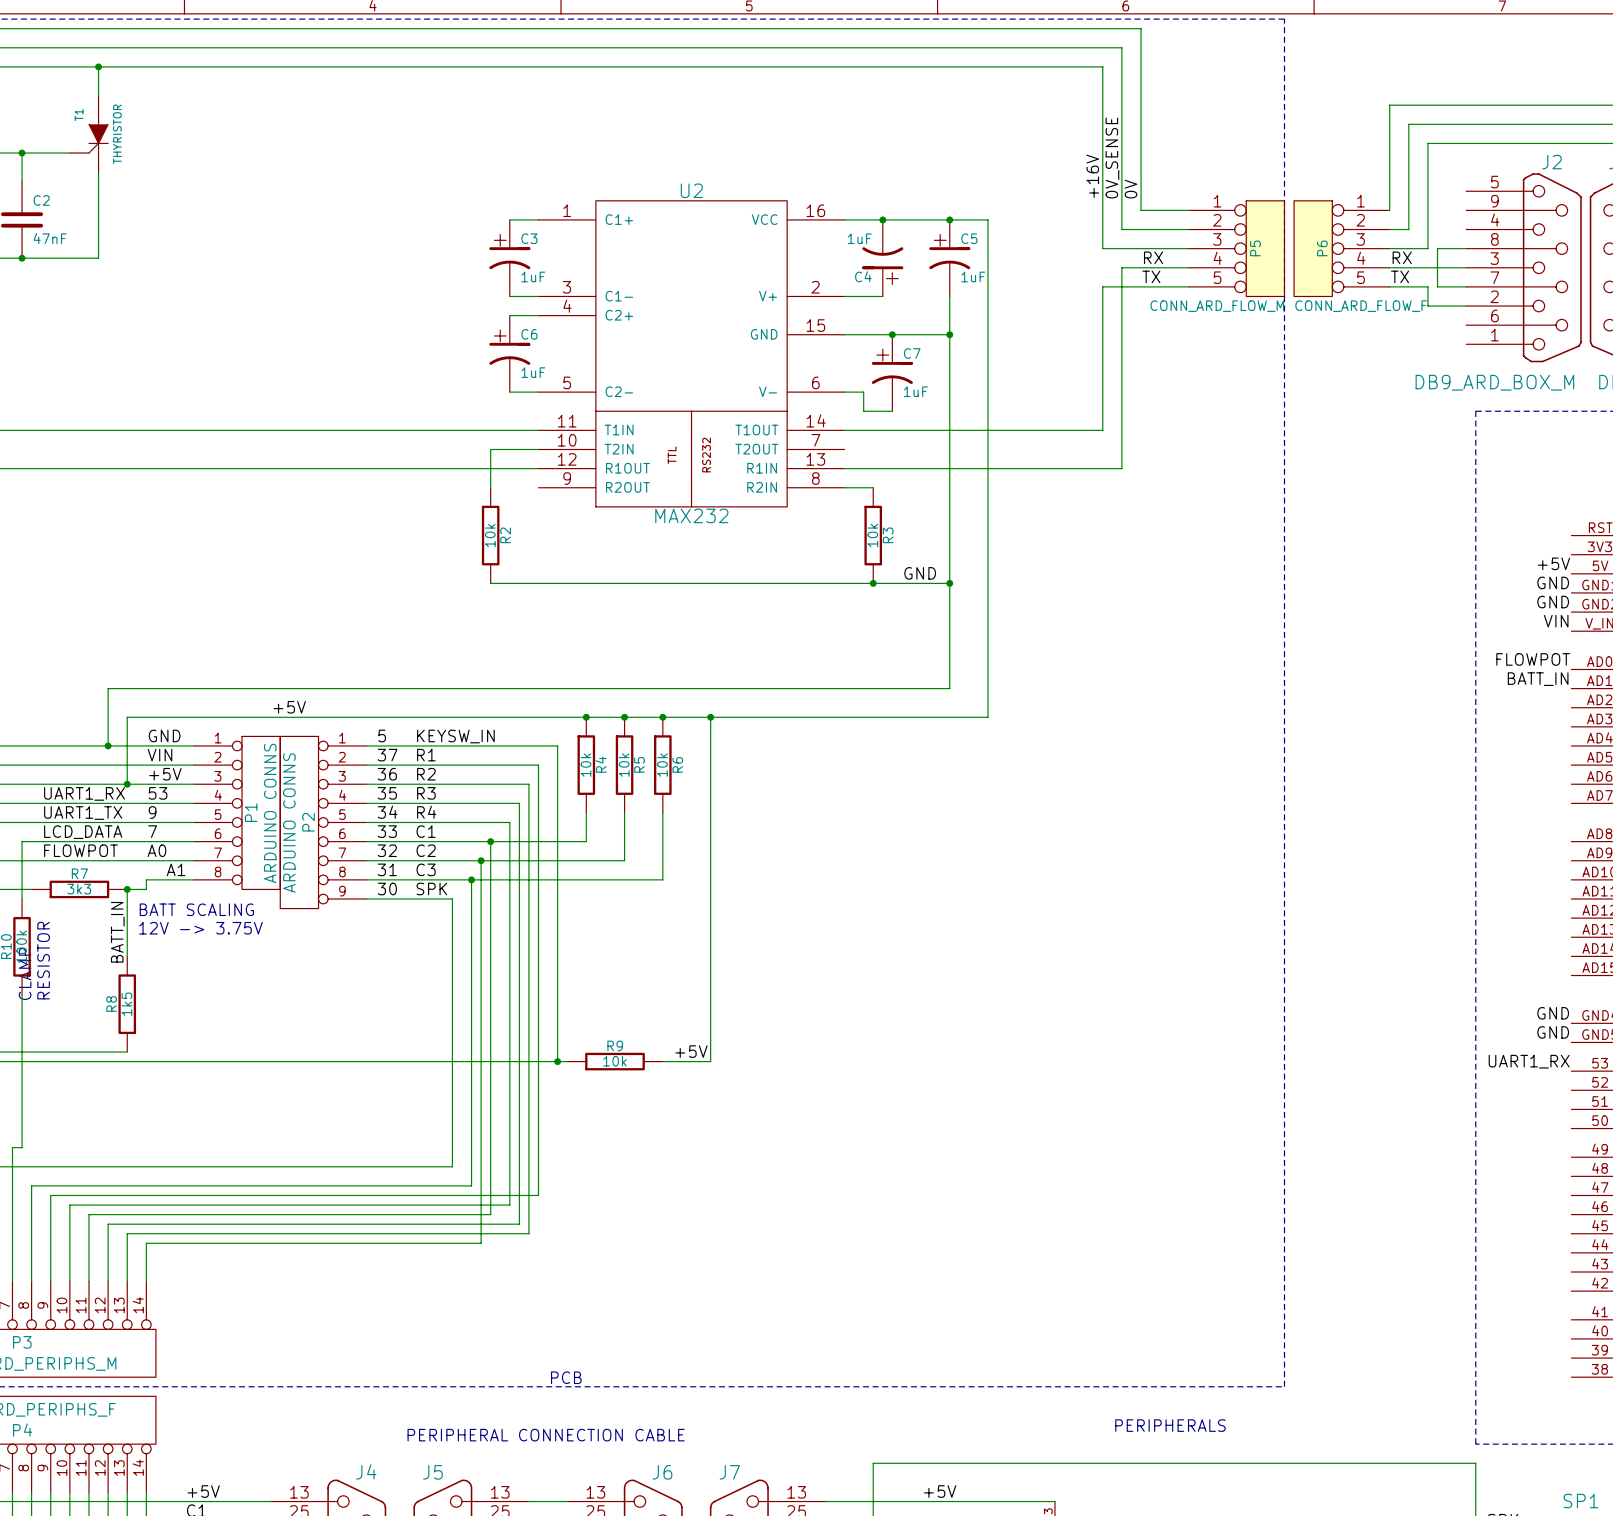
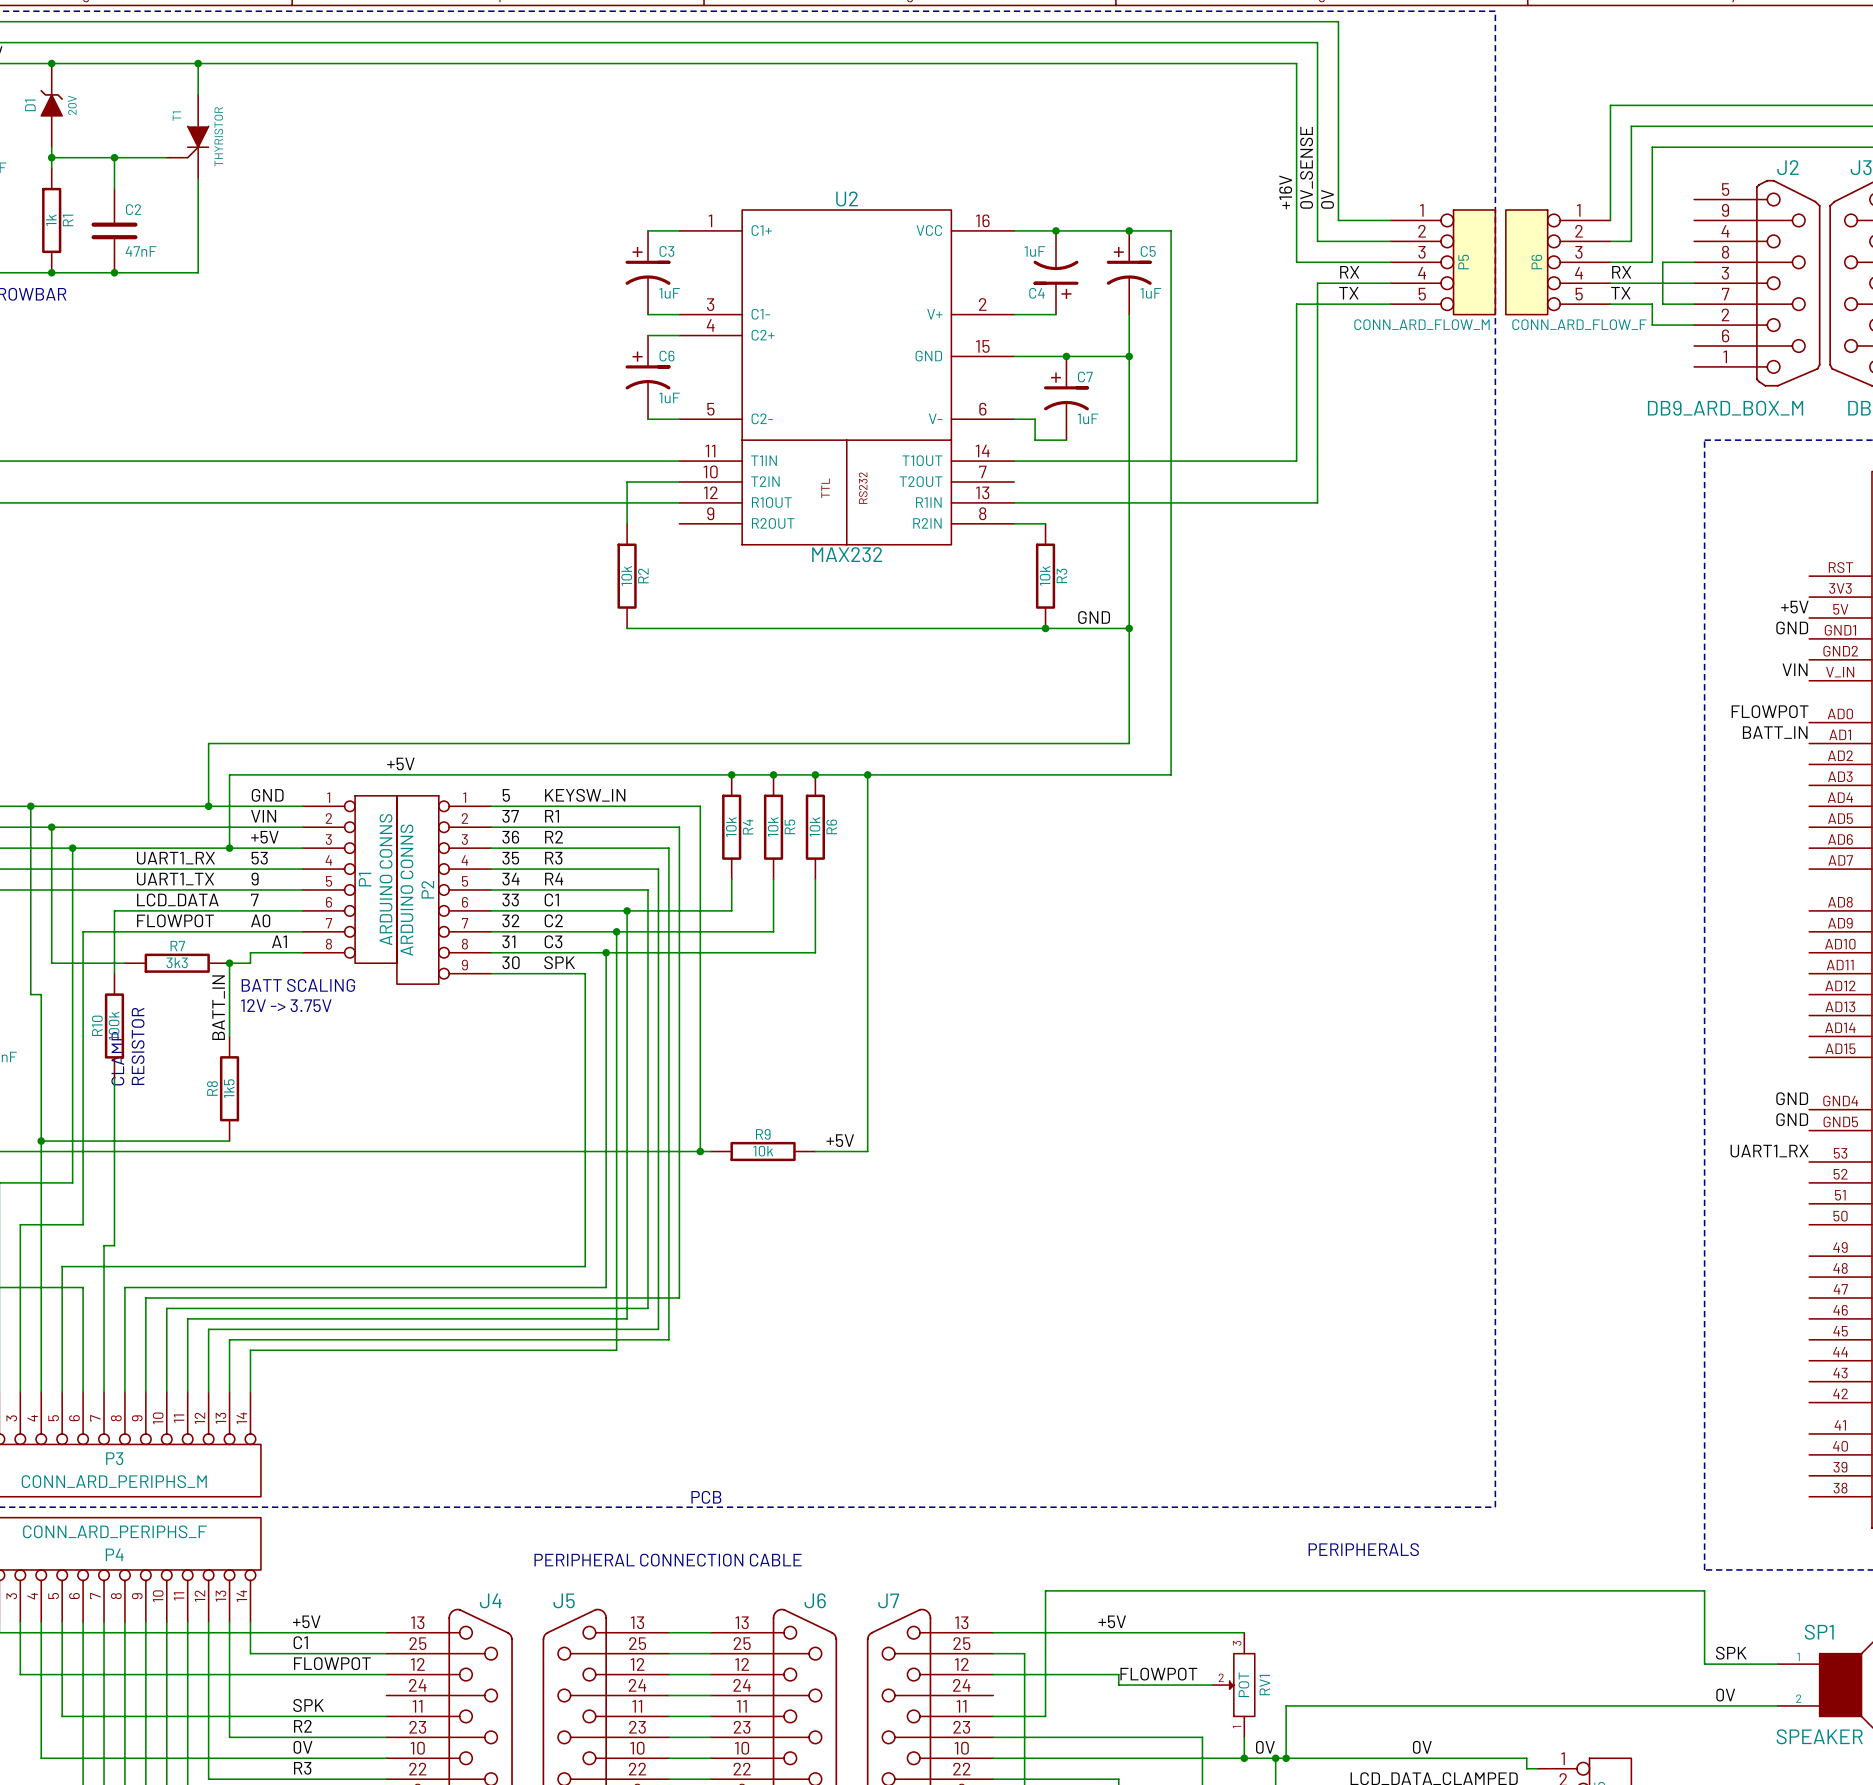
label: GND (1553, 602) -> none

